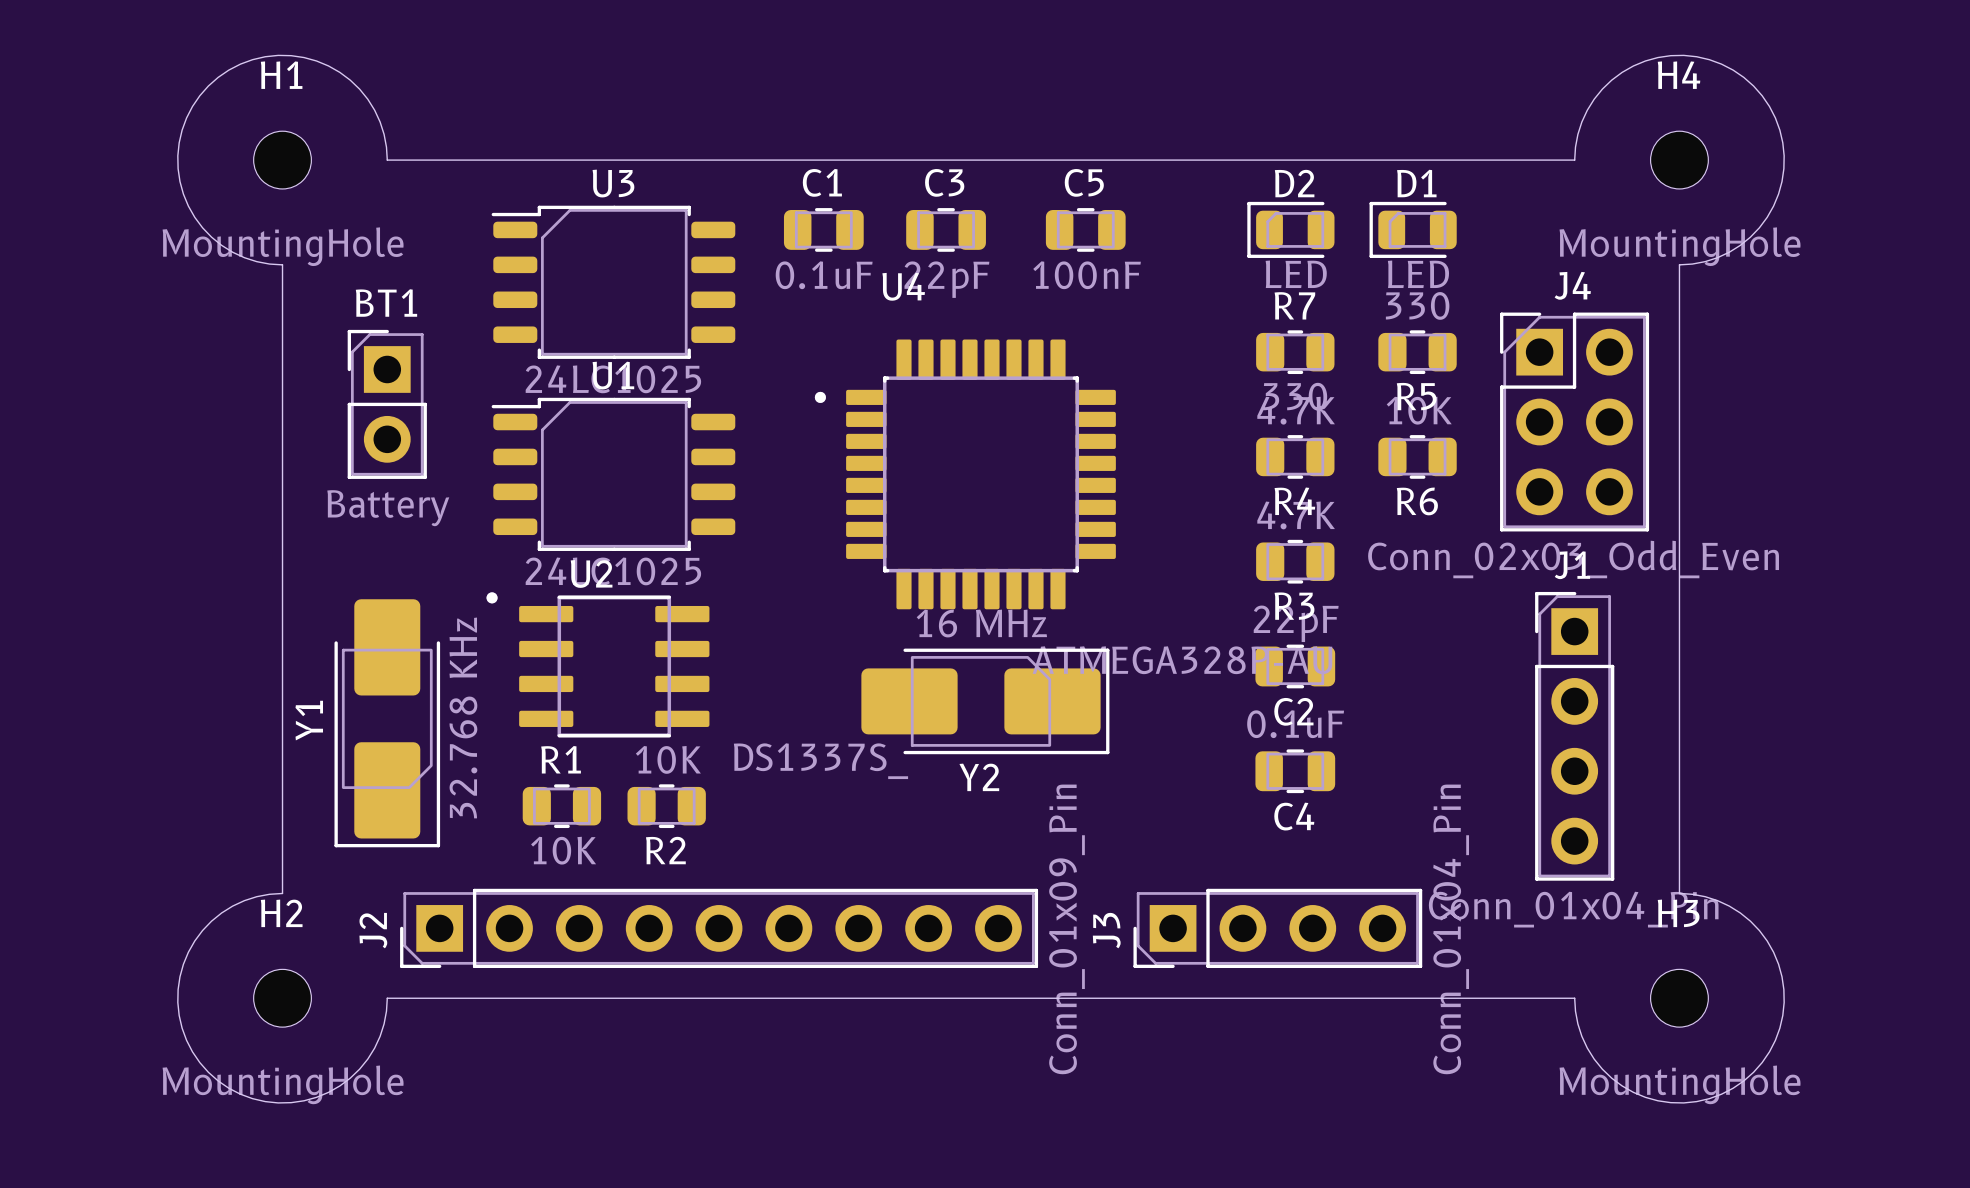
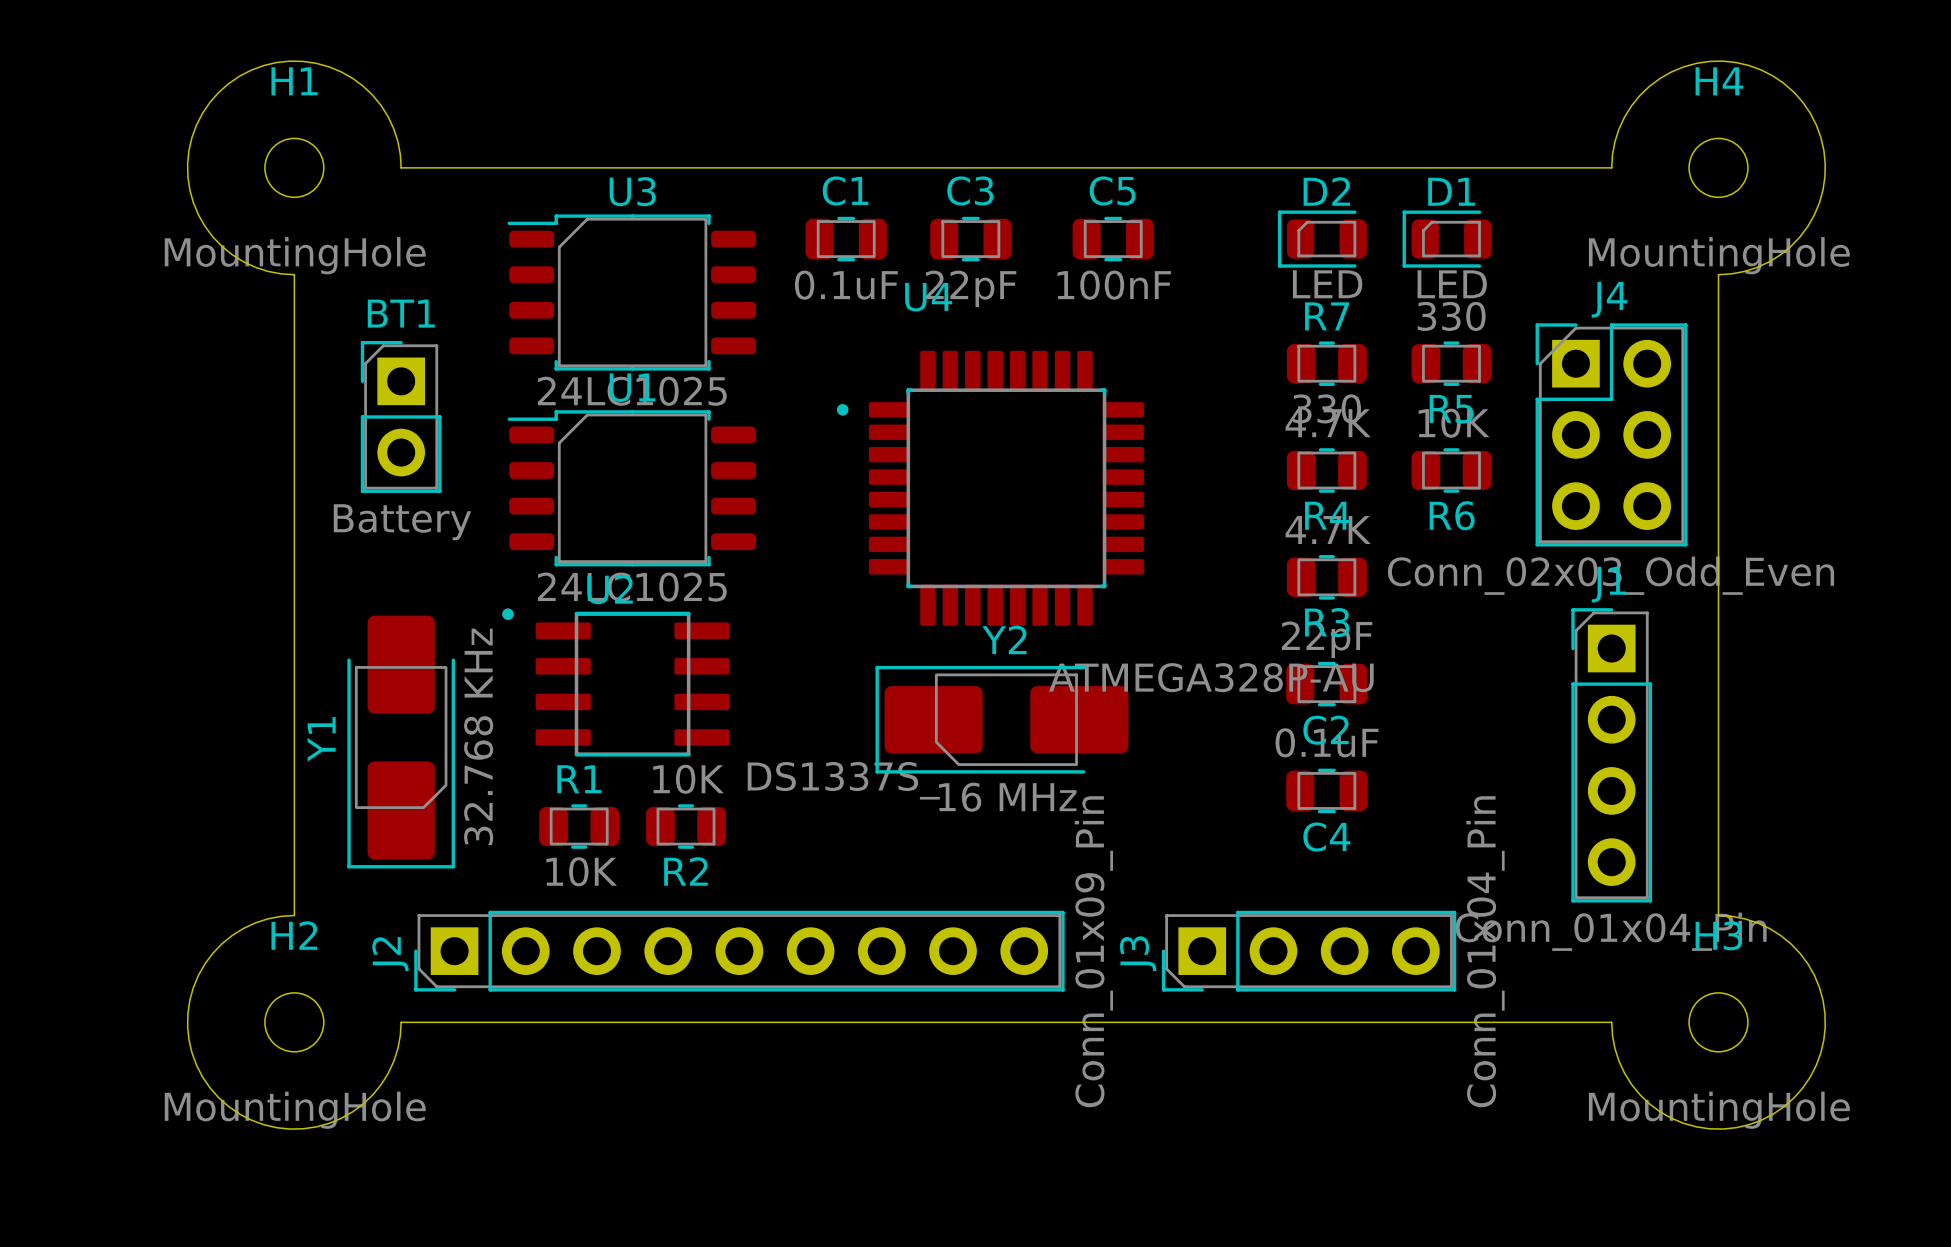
Y2 rotation: 0° (985, 701) -> 180° (1001, 719)

